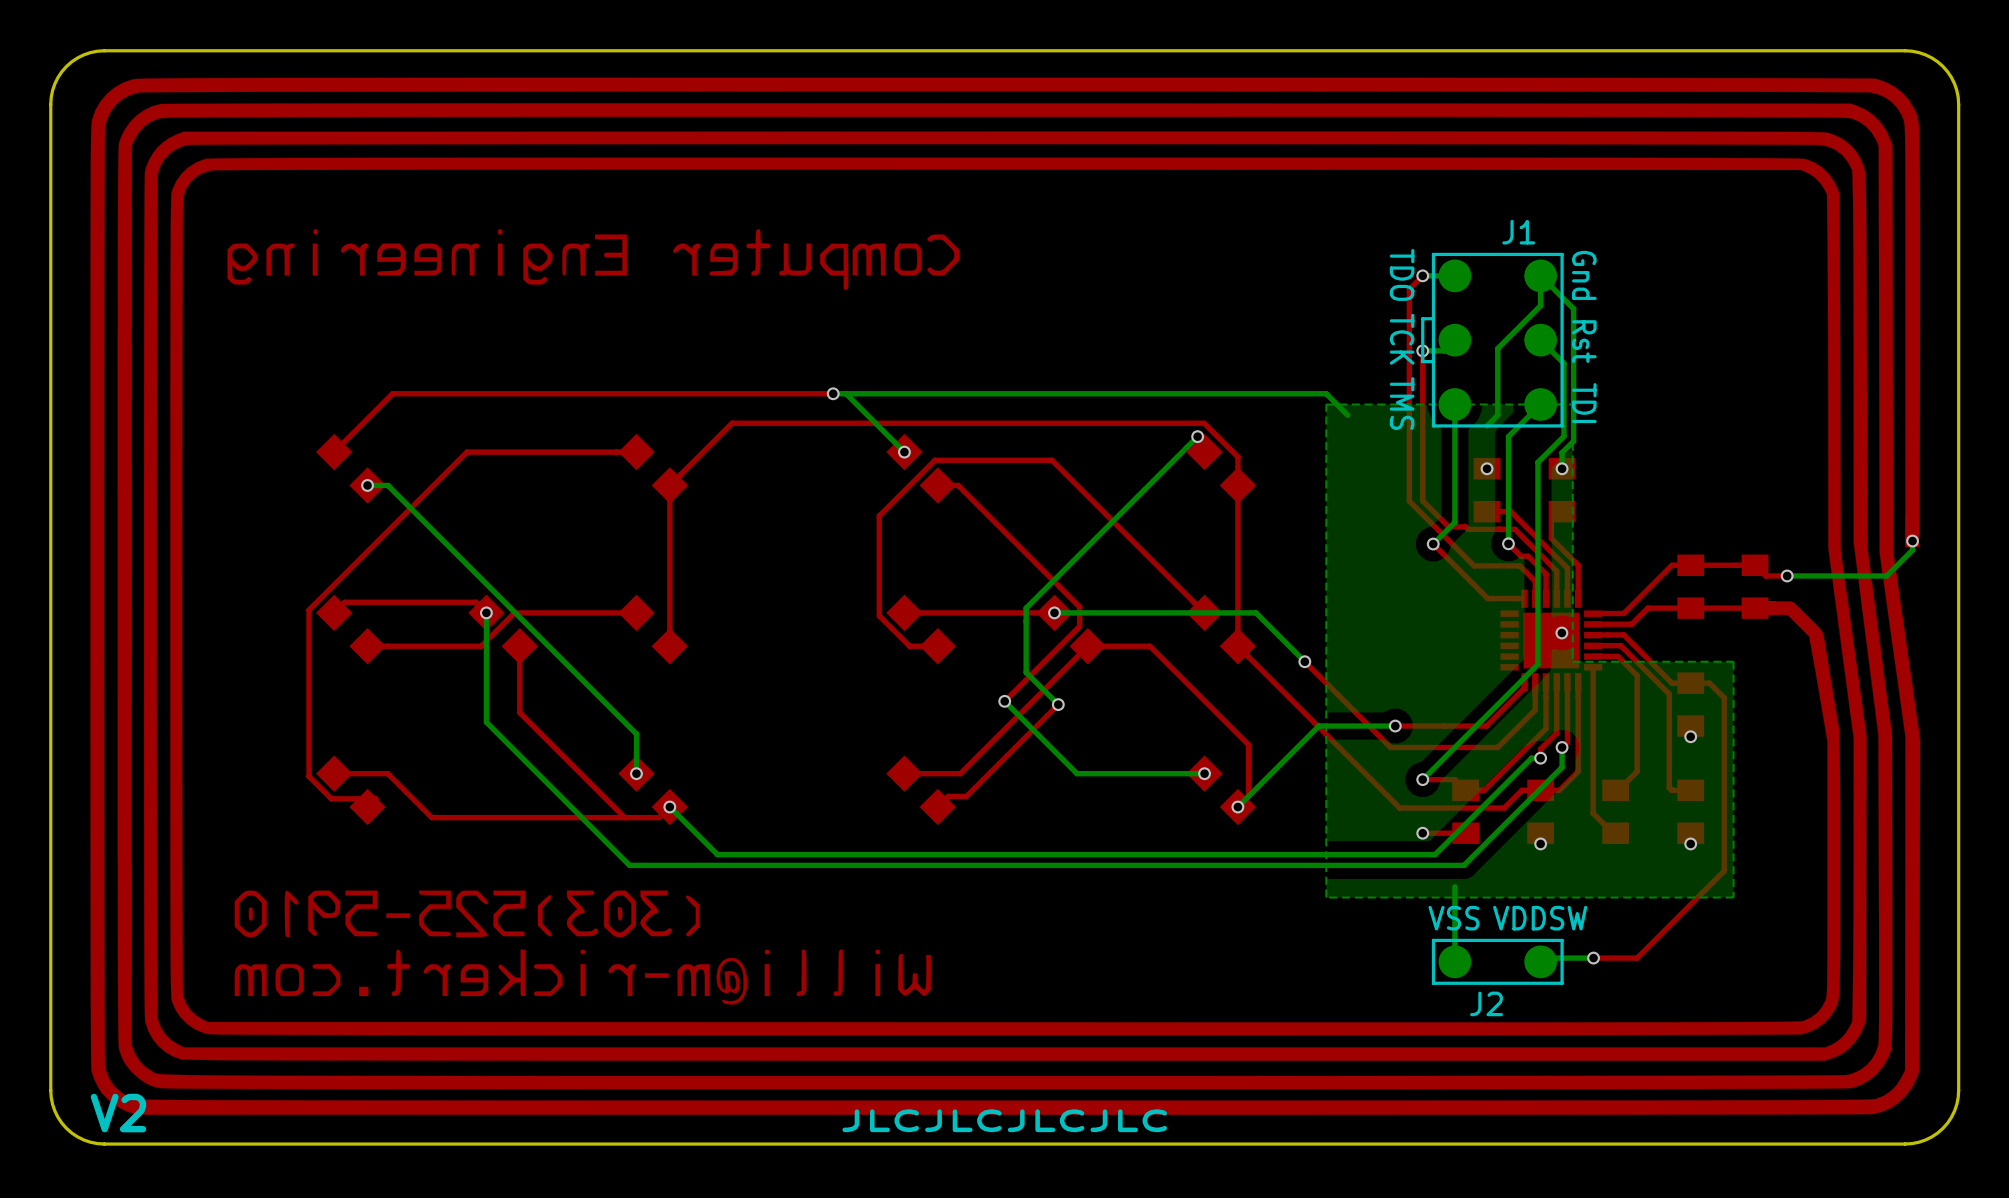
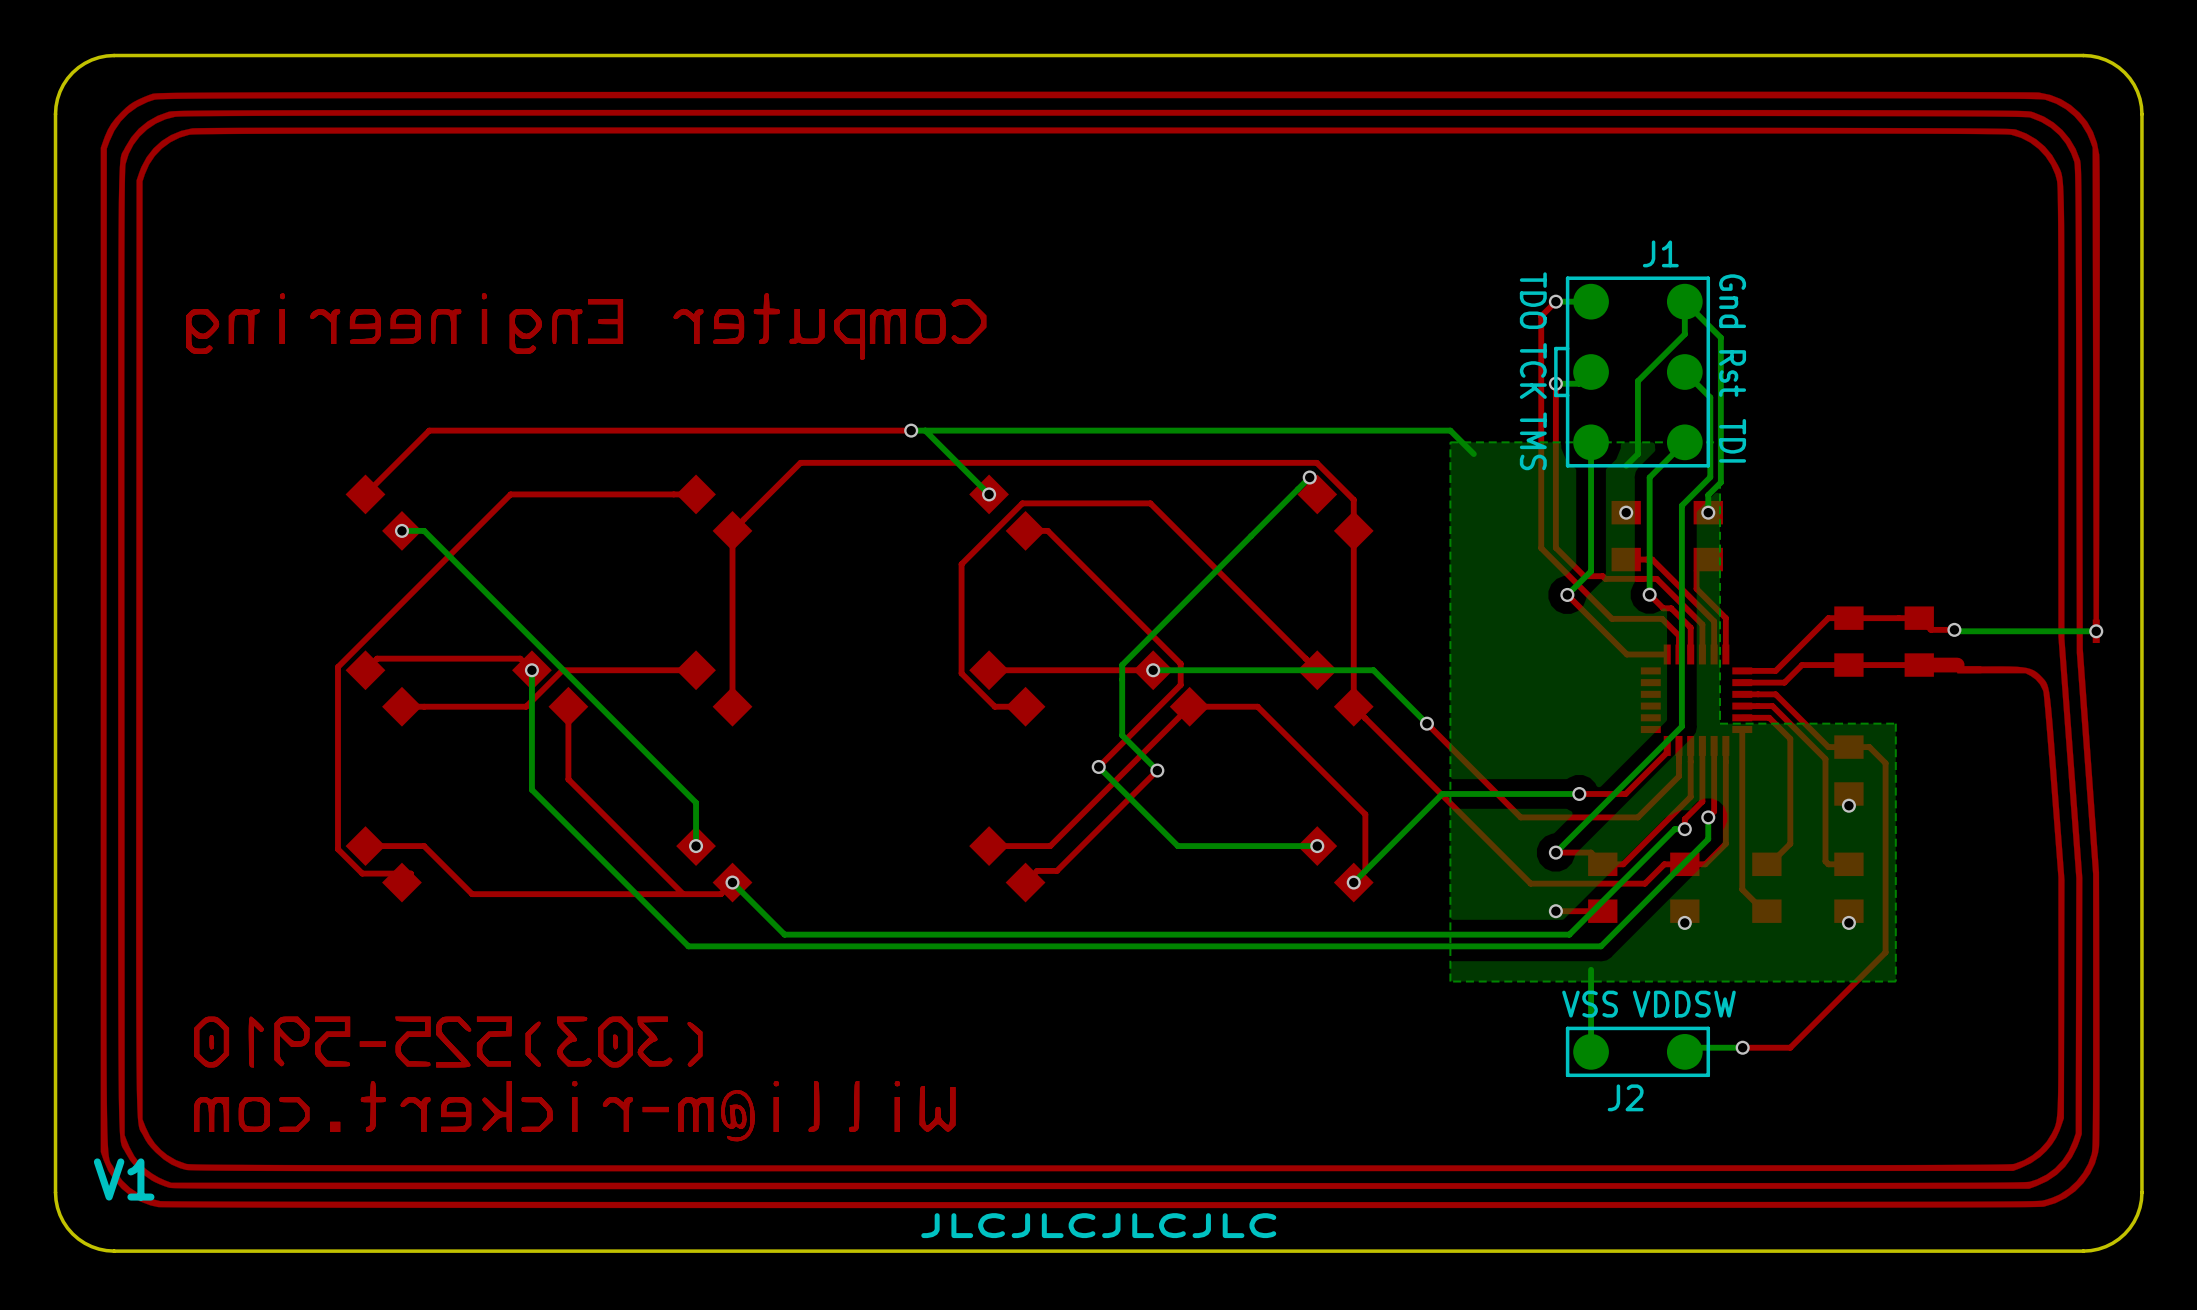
part footprint: [90, 77, 1921, 1115] -> [100, 91, 2100, 1209]
bottom track: (1912, 541) (1912, 550) (1886, 575) (1787, 575) -> none
via position: (1912, 541) -> (2096, 631)
bottom track: none -> (2096, 631) (1955, 631)
part footprint: [1500, 589, 1603, 692] -> [1640, 644, 1753, 756]
top track: (1791, 609) (1815, 633) -> none
drawing position: (593, 616) -> (586, 717)
via: (1561, 633) -> none
via position: (1395, 726) -> (1579, 793)
top track: (1444, 726) (1395, 726) -> none
bottom track: none -> (1579, 793) (1525, 793)
text: none -> V1 (124, 1179)
text: V2 (118, 1113) -> none

